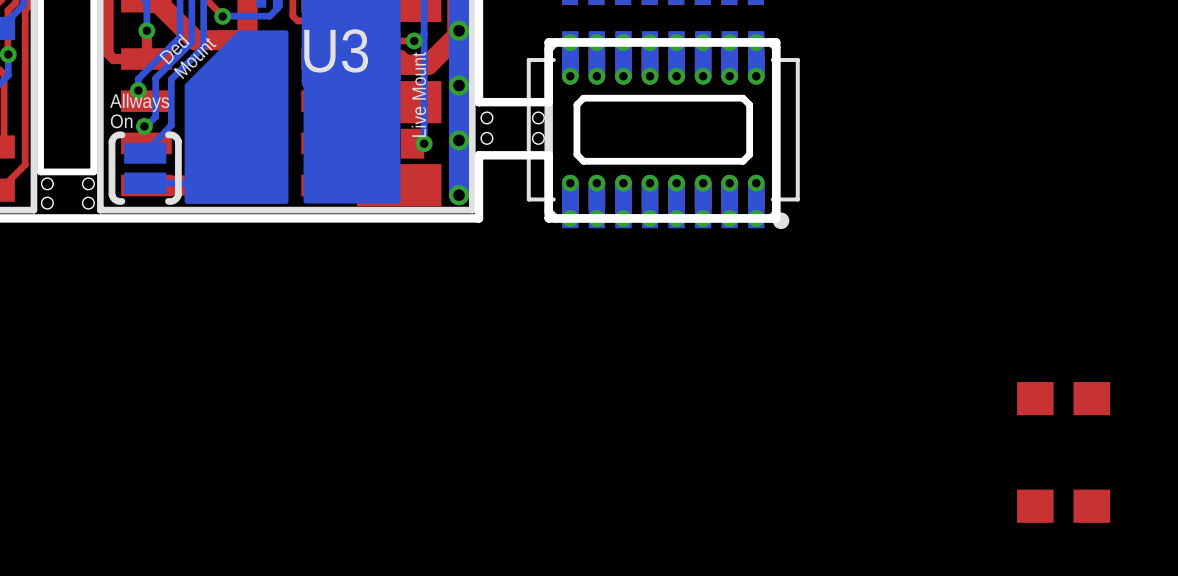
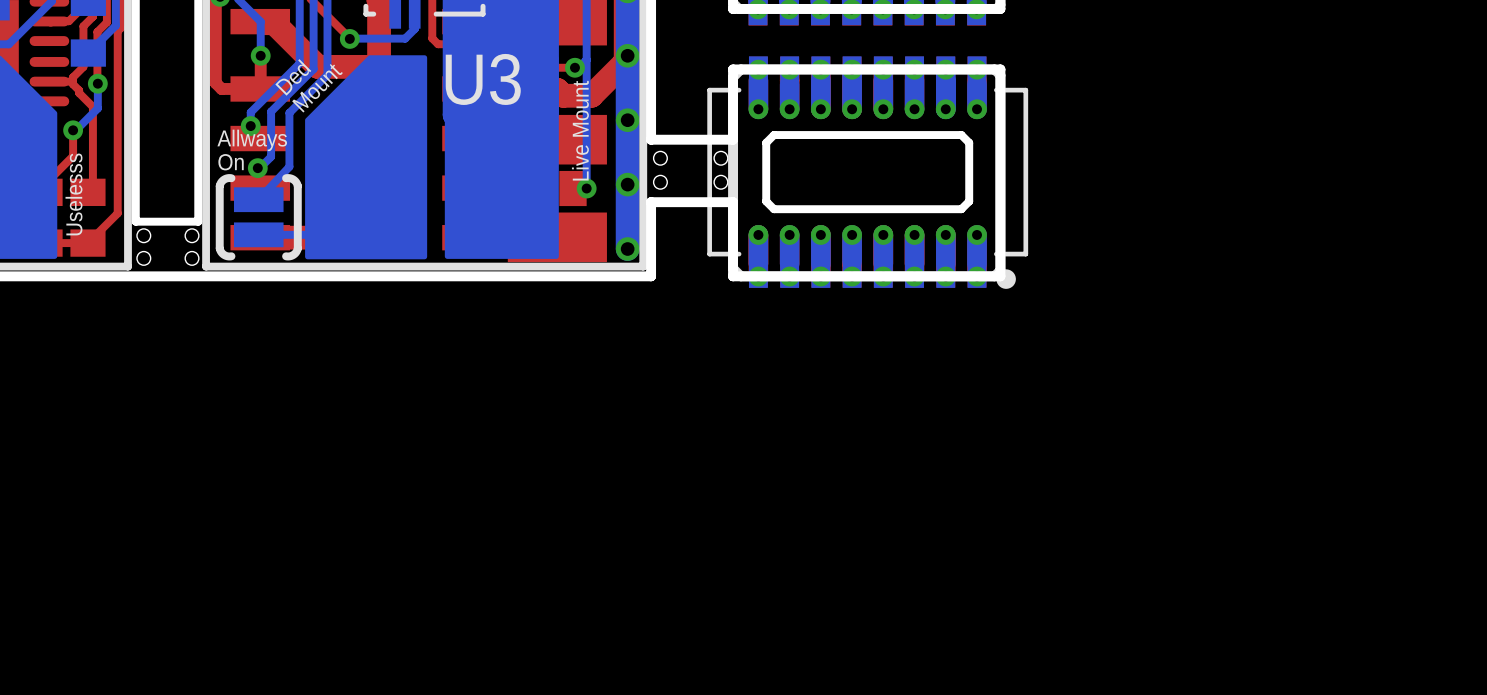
part: (1063, 398) -> none
part: (1063, 506) -> none

